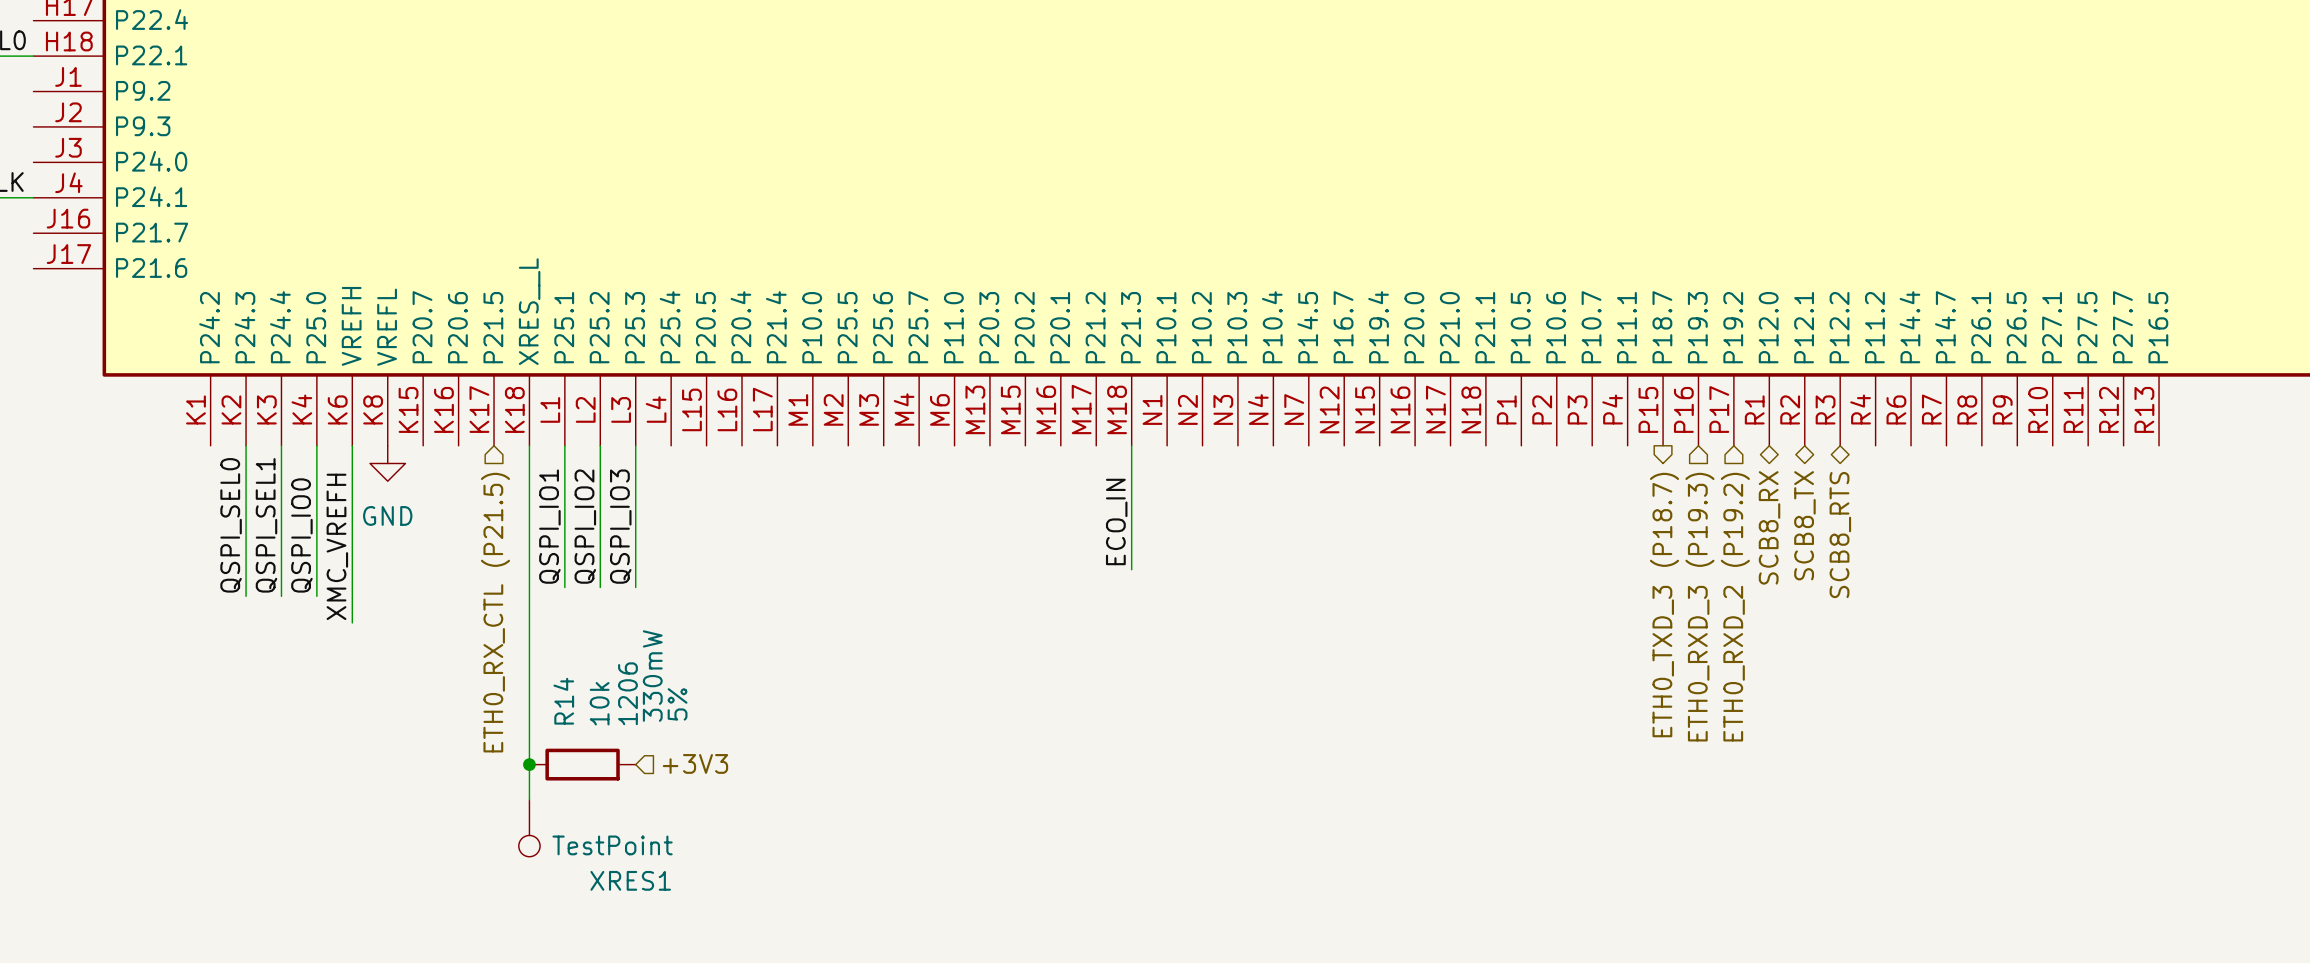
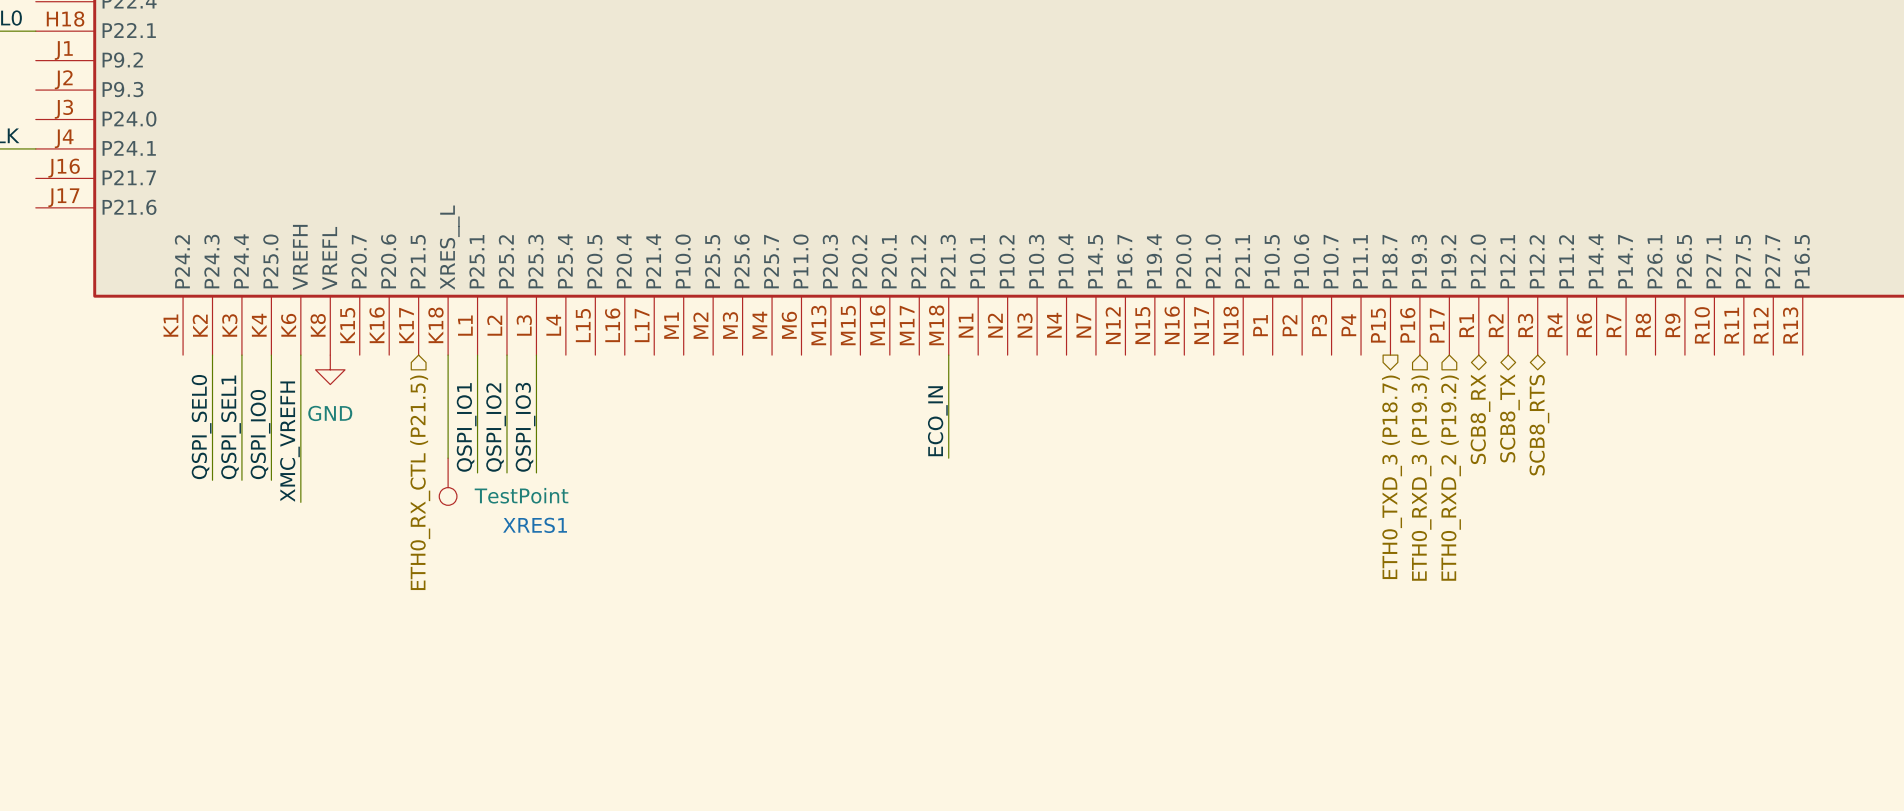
wire: (529, 569) (529, 800) -> none
hierarchical label: +3V3 (695, 763) -> none
junction: (529, 764) -> none
R14: 10k (582, 764) -> none
XRES1 position: (529, 828) -> (448, 481)

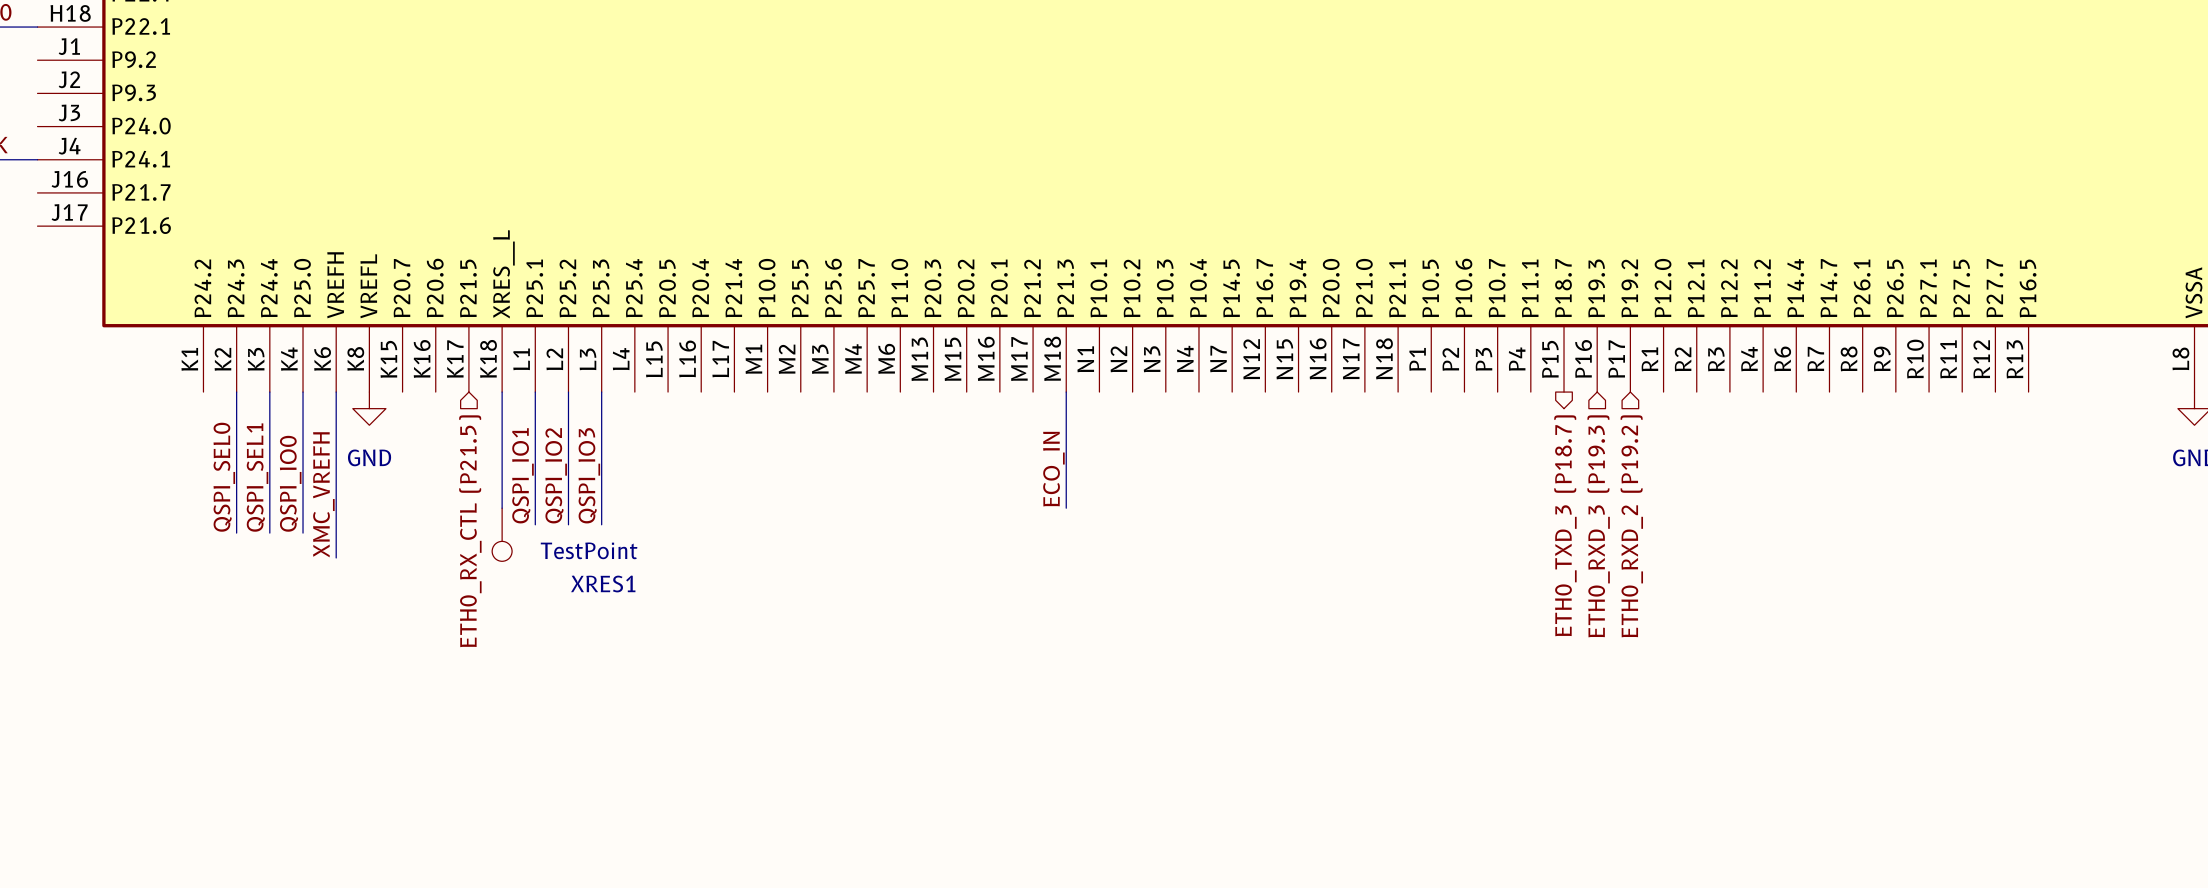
hierarchical label: SCB8_TX (1509, 418) -> none
hierarchical label: SCB8_RX (1480, 419) -> none
hierarchical label: SCB8_RTS (1539, 425) -> none

